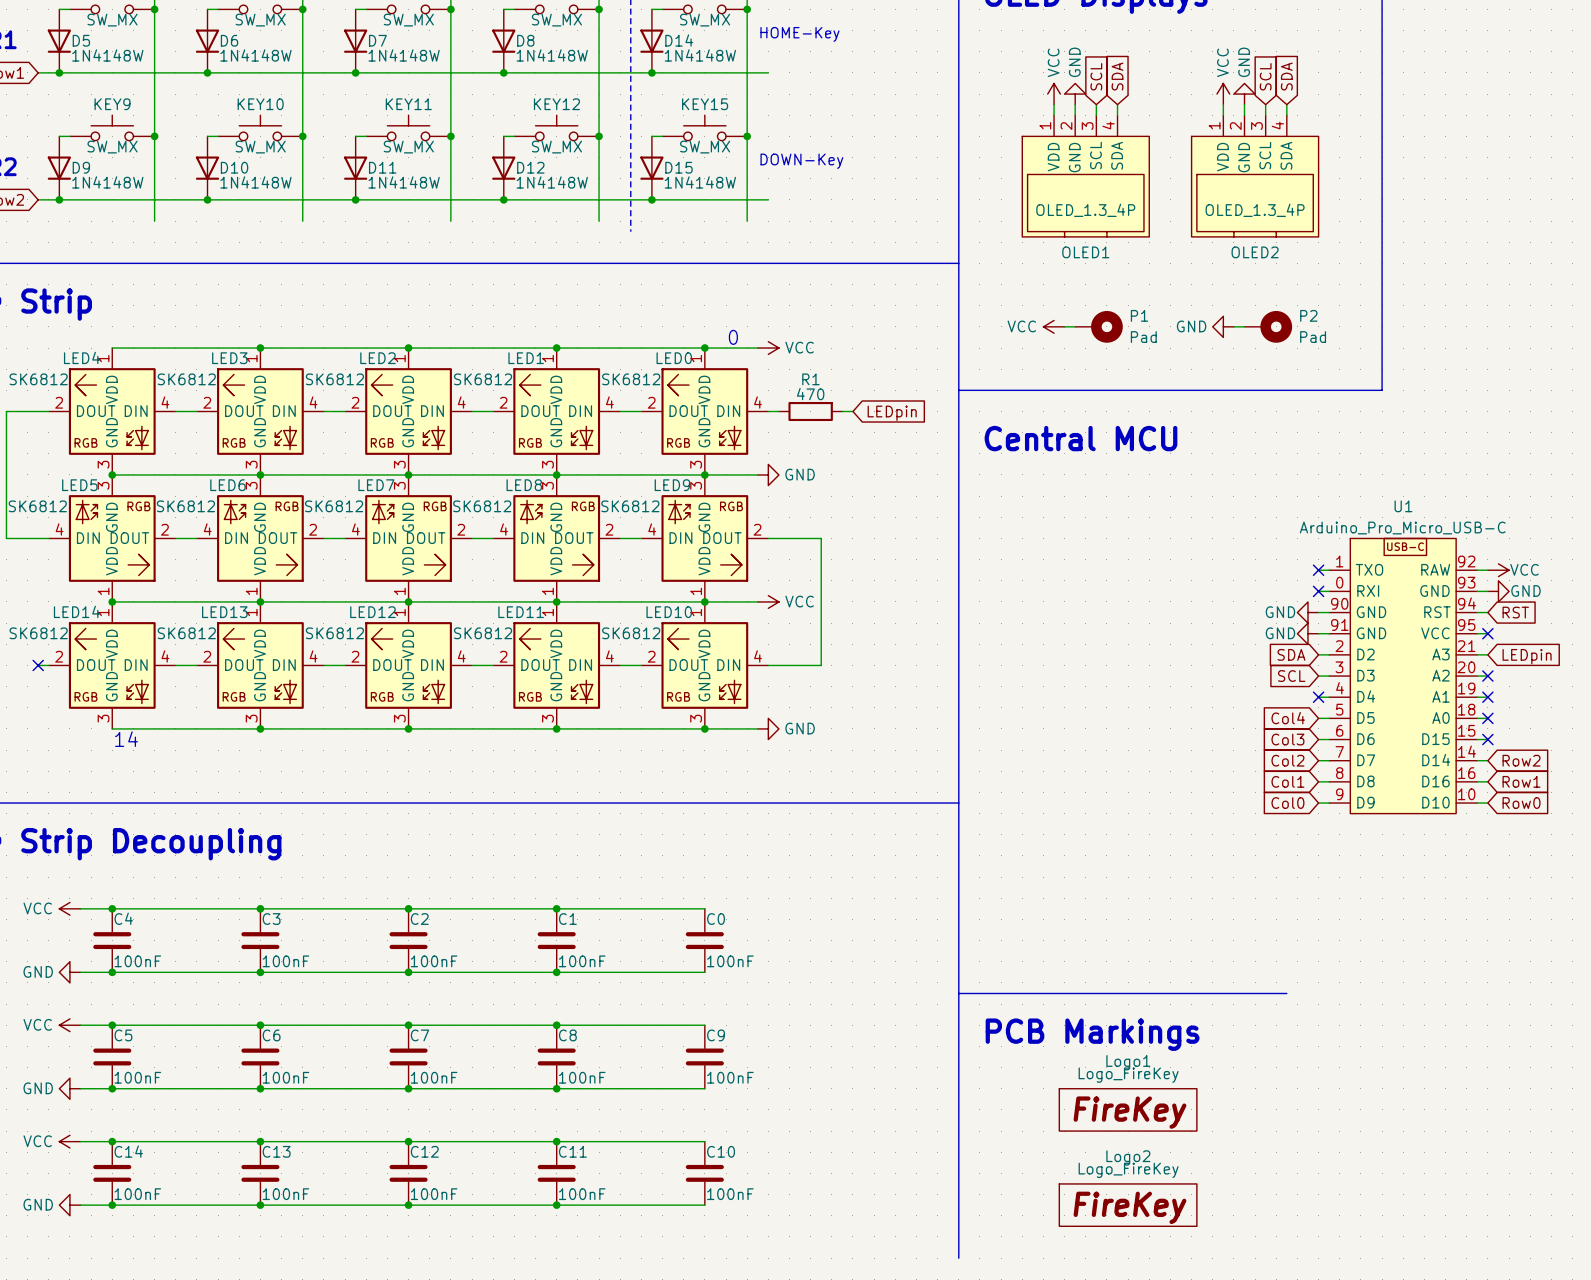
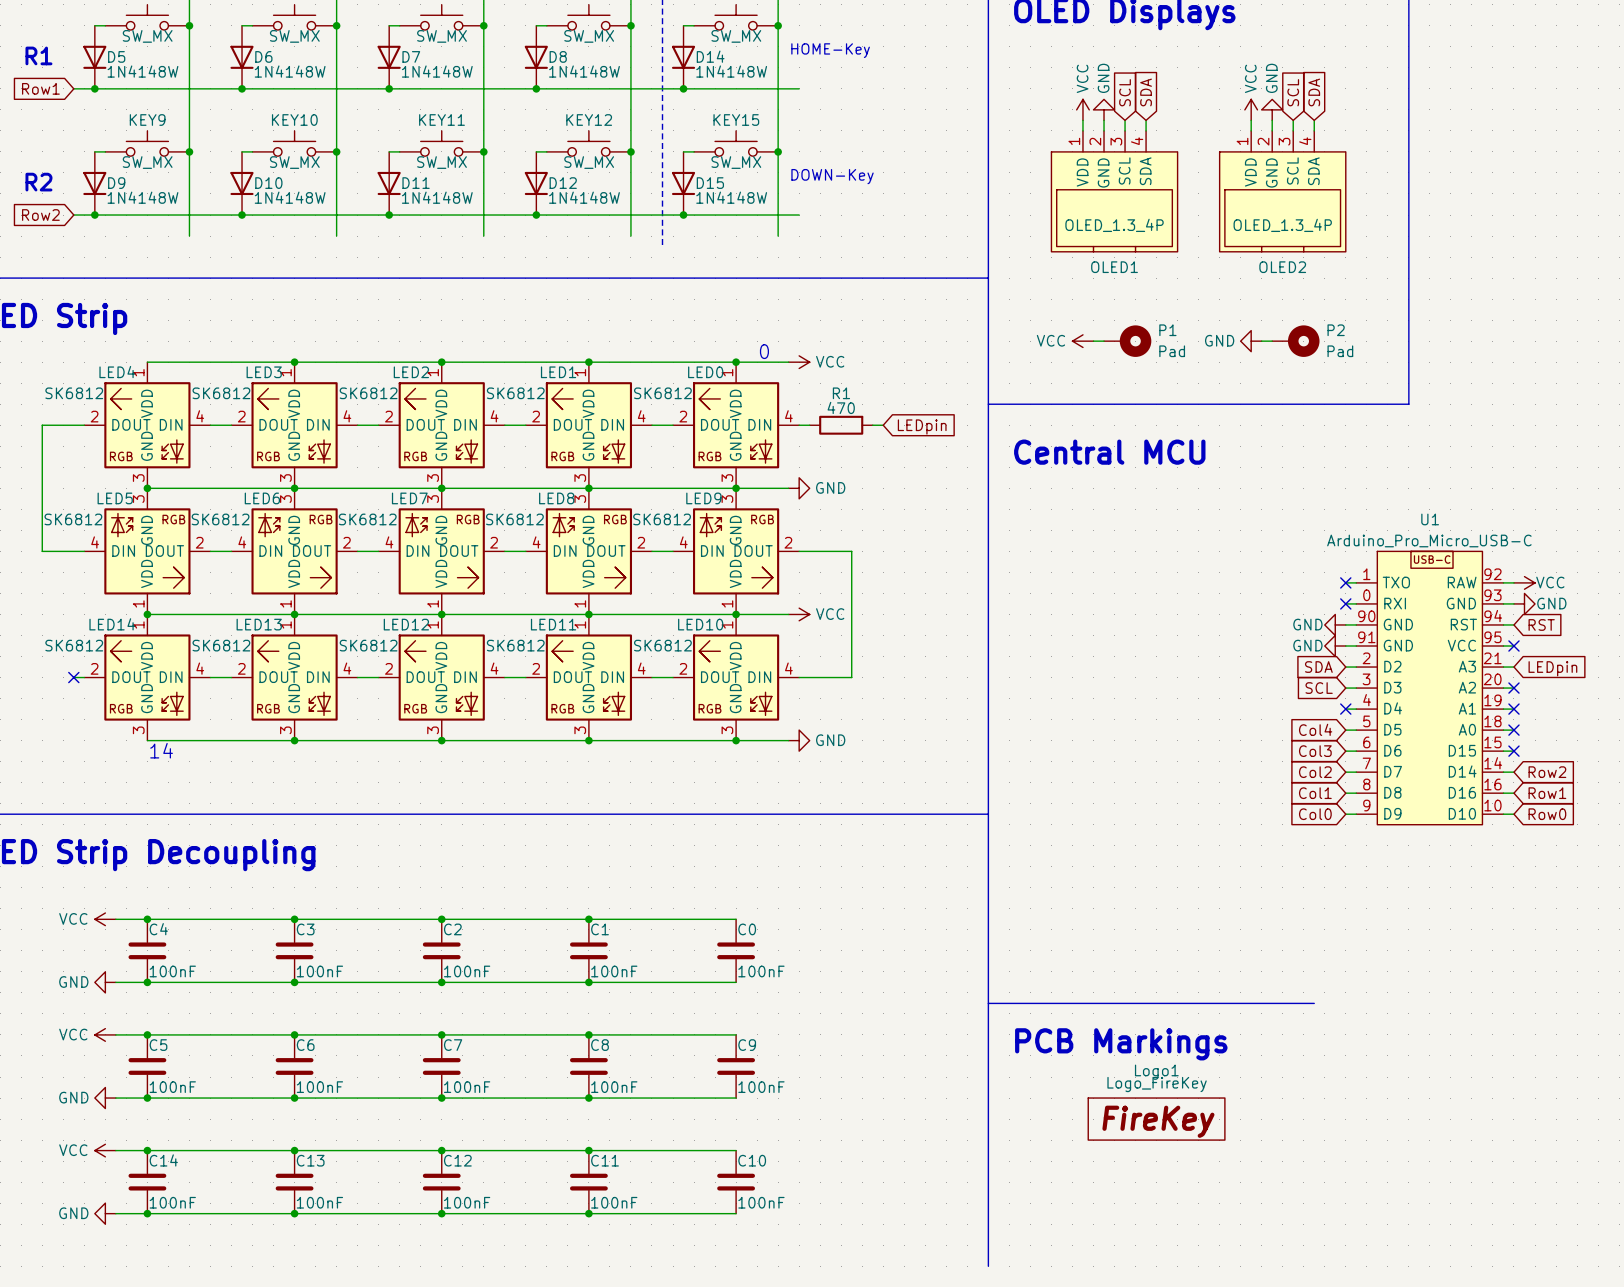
Logo2: Logo_FireKey (1128, 1205) -> none

